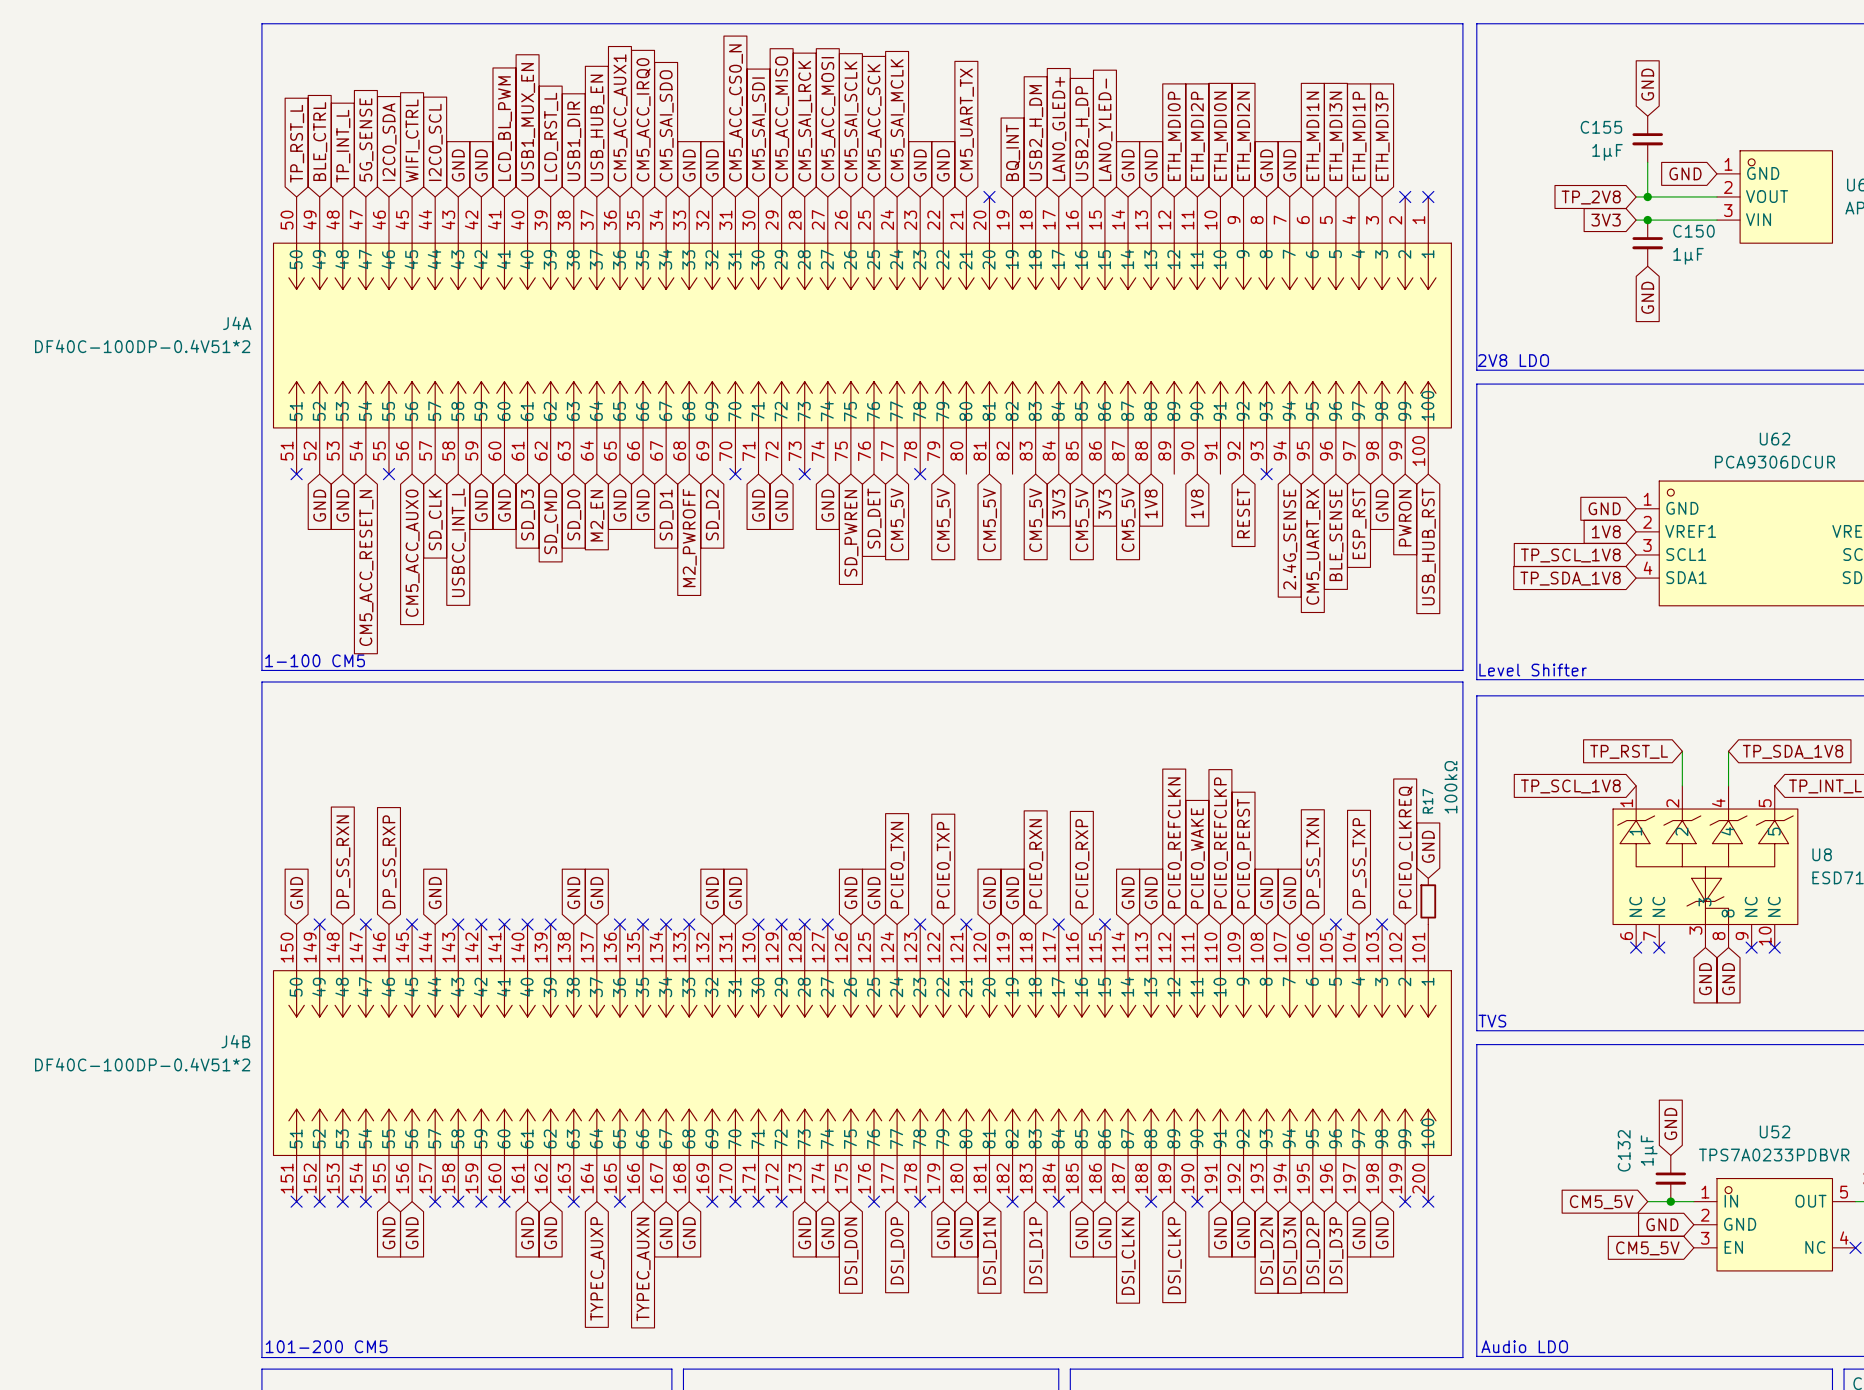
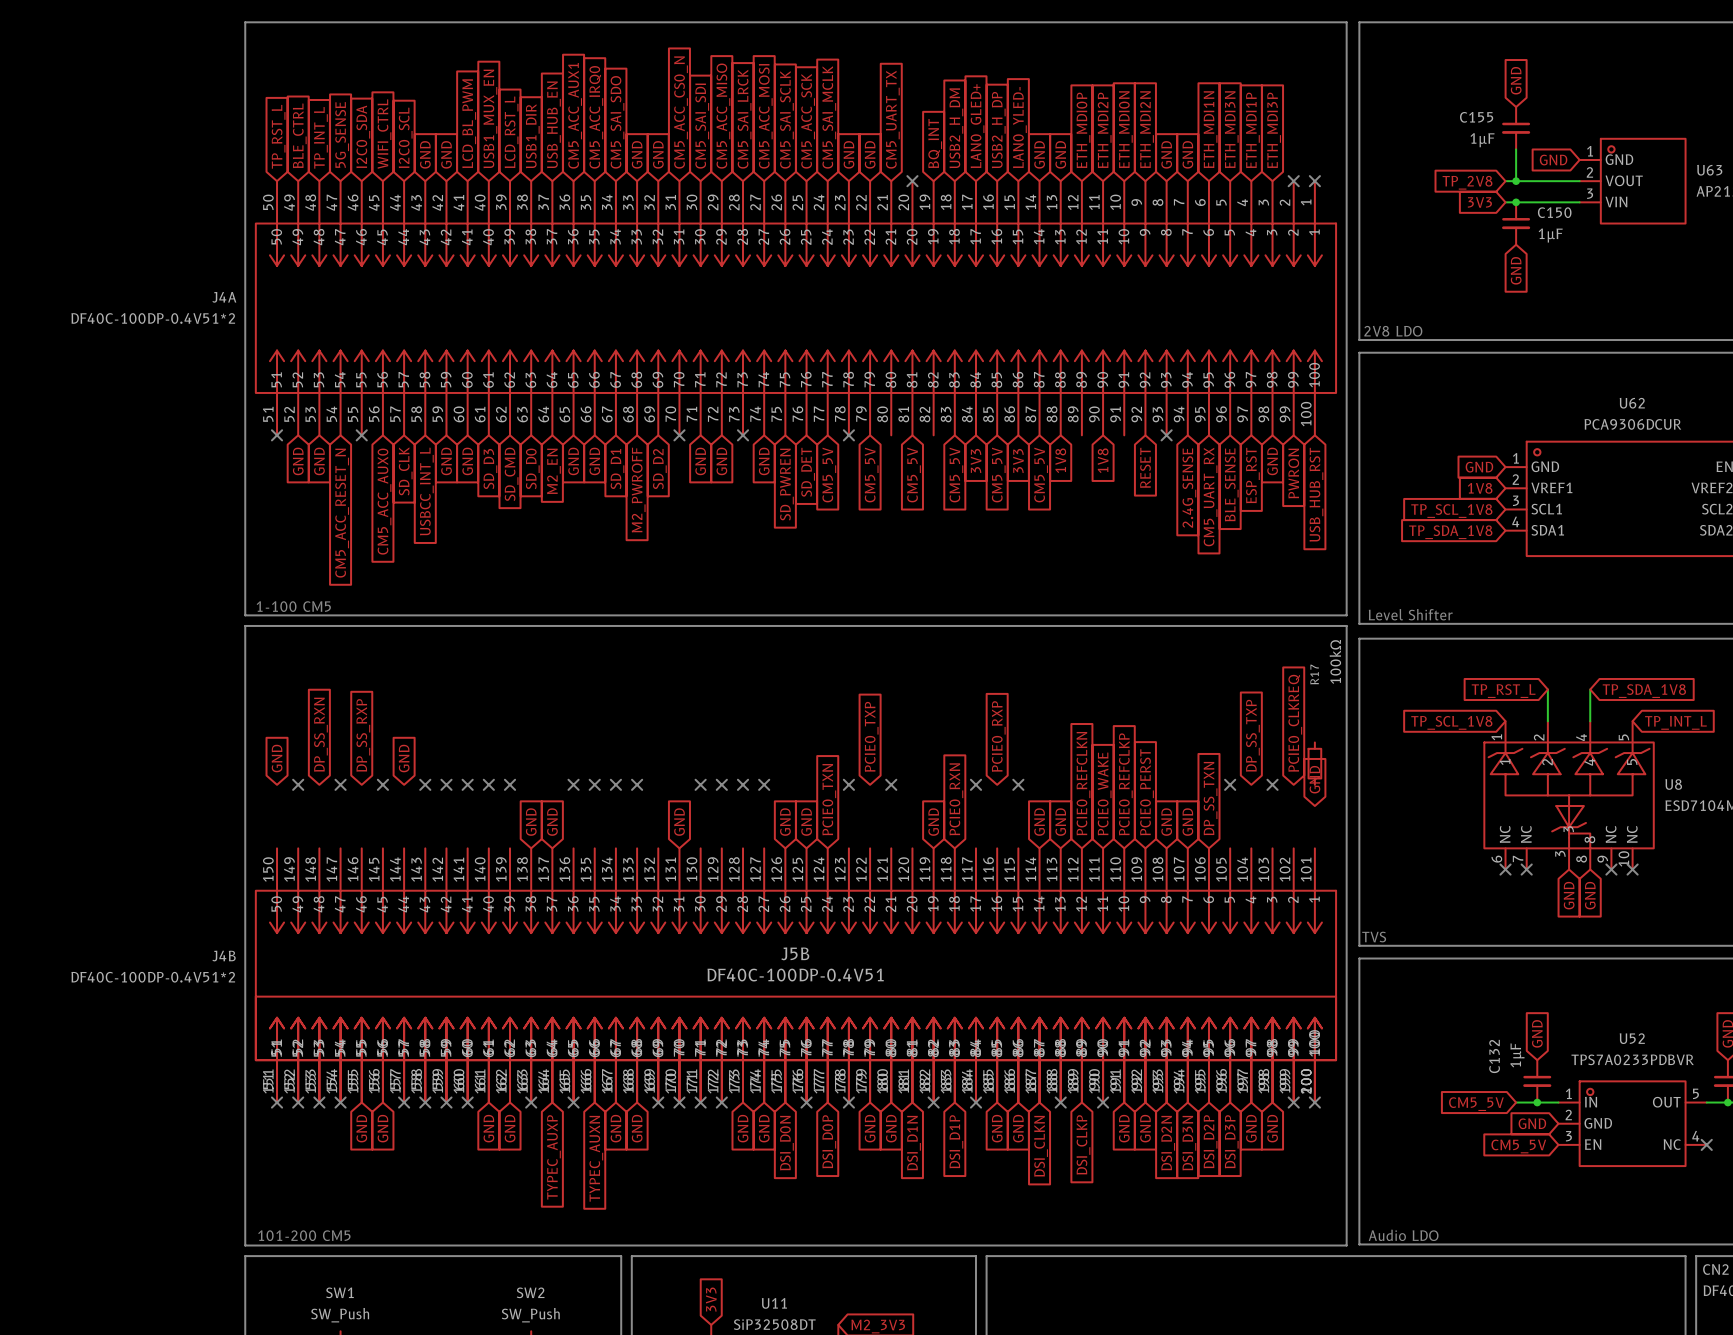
global label position: PCIE0_CLKREQ (1405, 847) -> PCIE0_CLKREQ (1295, 723)
no-connect mark: none -> (298, 784)
no-connect mark: none -> (340, 784)
no-connect mark: none -> (382, 784)
no-connect mark: none -> (425, 784)
no-connect mark: none -> (446, 784)
no-connect mark: none -> (467, 784)
no-connect mark: none -> (488, 784)
no-connect mark: none -> (510, 784)
no-connect mark: none -> (573, 784)
no-connect mark: none -> (594, 784)
no-connect mark: none -> (615, 784)
no-connect mark: none -> (637, 784)
no-connect mark: none -> (700, 784)
no-connect mark: none -> (721, 784)
no-connect mark: none -> (743, 784)
no-connect mark: none -> (764, 784)
no-connect mark: none -> (848, 784)
no-connect mark: none -> (891, 784)
no-connect mark: none -> (975, 784)
no-connect mark: none -> (1018, 784)
no-connect mark: none -> (1230, 784)
no-connect mark: none -> (1272, 784)
global label position: DP_SS_RXN (343, 861) -> DP_SS_RXN (320, 734)
global label position: DP_SS_RXP (389, 861) -> DP_SS_RXP (363, 735)
global label position: PCIE0_RXP (1082, 863) -> PCIE0_RXP (998, 736)
global label position: DP_SS_TXP (1359, 863) -> DP_SS_TXP (1252, 735)
global label position: PCIE0_TXP (943, 865) -> PCIE0_TXP (871, 736)
global label position: GND (296, 893) -> GND (277, 758)
global label position: GND (435, 893) -> GND (404, 758)
global label: GND (712, 893) -> none
global label: GND (989, 893) -> none
R17 position: (1428, 901) -> (1314, 763)
no-connect mark: (319, 924) -> none
no-connect mark: (365, 924) -> none
no-connect mark: (412, 924) -> none
no-connect mark: (458, 924) -> none
no-connect mark: (481, 924) -> none
no-connect mark: (504, 924) -> none
no-connect mark: (527, 924) -> none
no-connect mark: (550, 924) -> none
no-connect mark: (619, 924) -> none
no-connect mark: (643, 924) -> none
no-connect mark: (666, 924) -> none
no-connect mark: (689, 924) -> none
no-connect mark: (758, 924) -> none
no-connect mark: (781, 924) -> none
no-connect mark: (804, 924) -> none
no-connect mark: (827, 924) -> none
no-connect mark: (920, 924) -> none
no-connect mark: (966, 924) -> none
no-connect mark: (1058, 924) -> none
no-connect mark: (1104, 924) -> none
no-connect mark: (1335, 924) -> none
no-connect mark: (1382, 924) -> none
J5B: none -> DF40C-100DP-0.4V51 (795, 1049)

